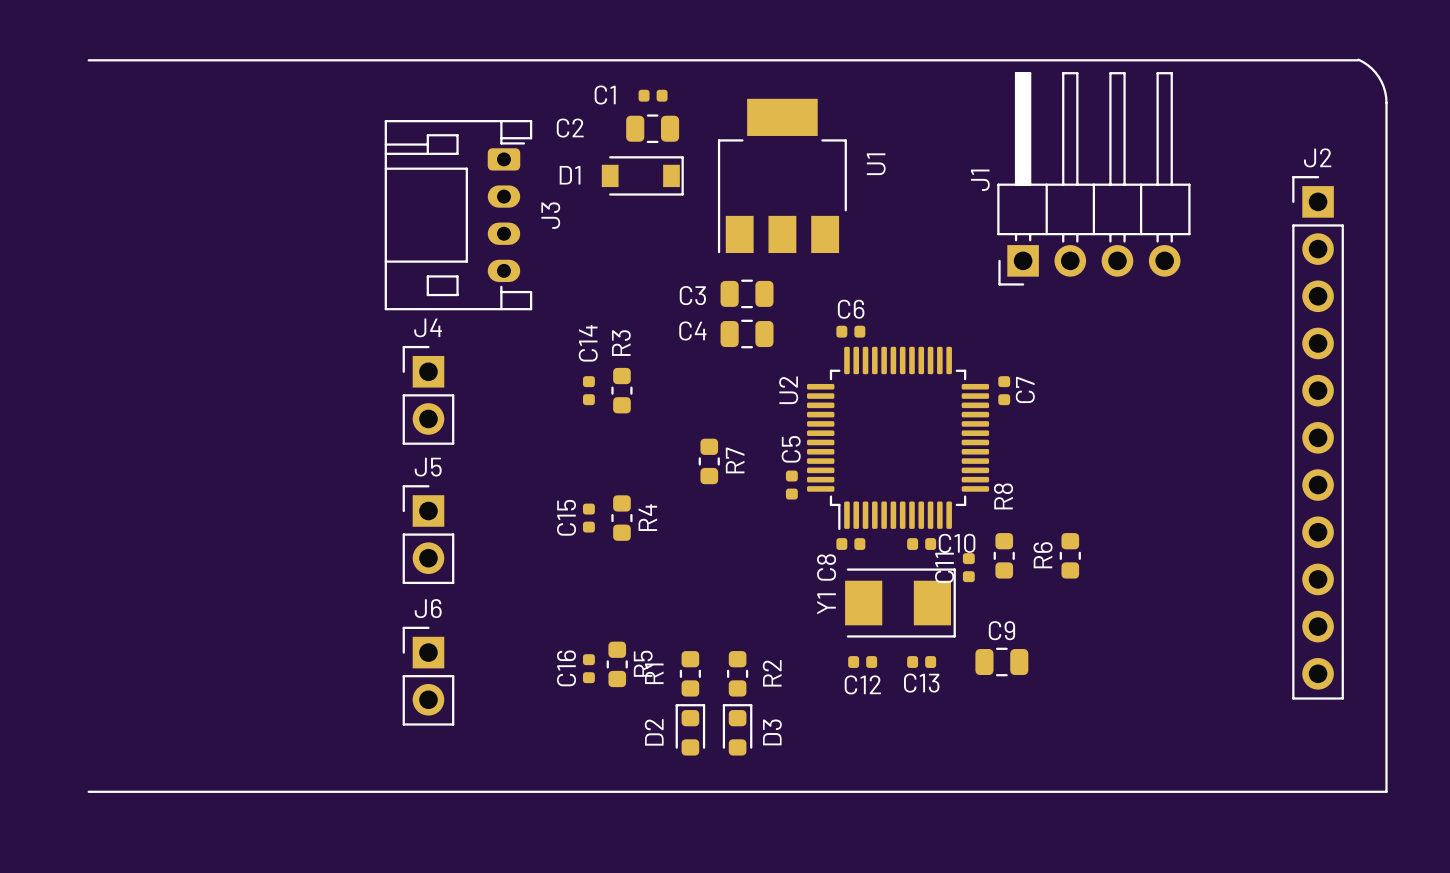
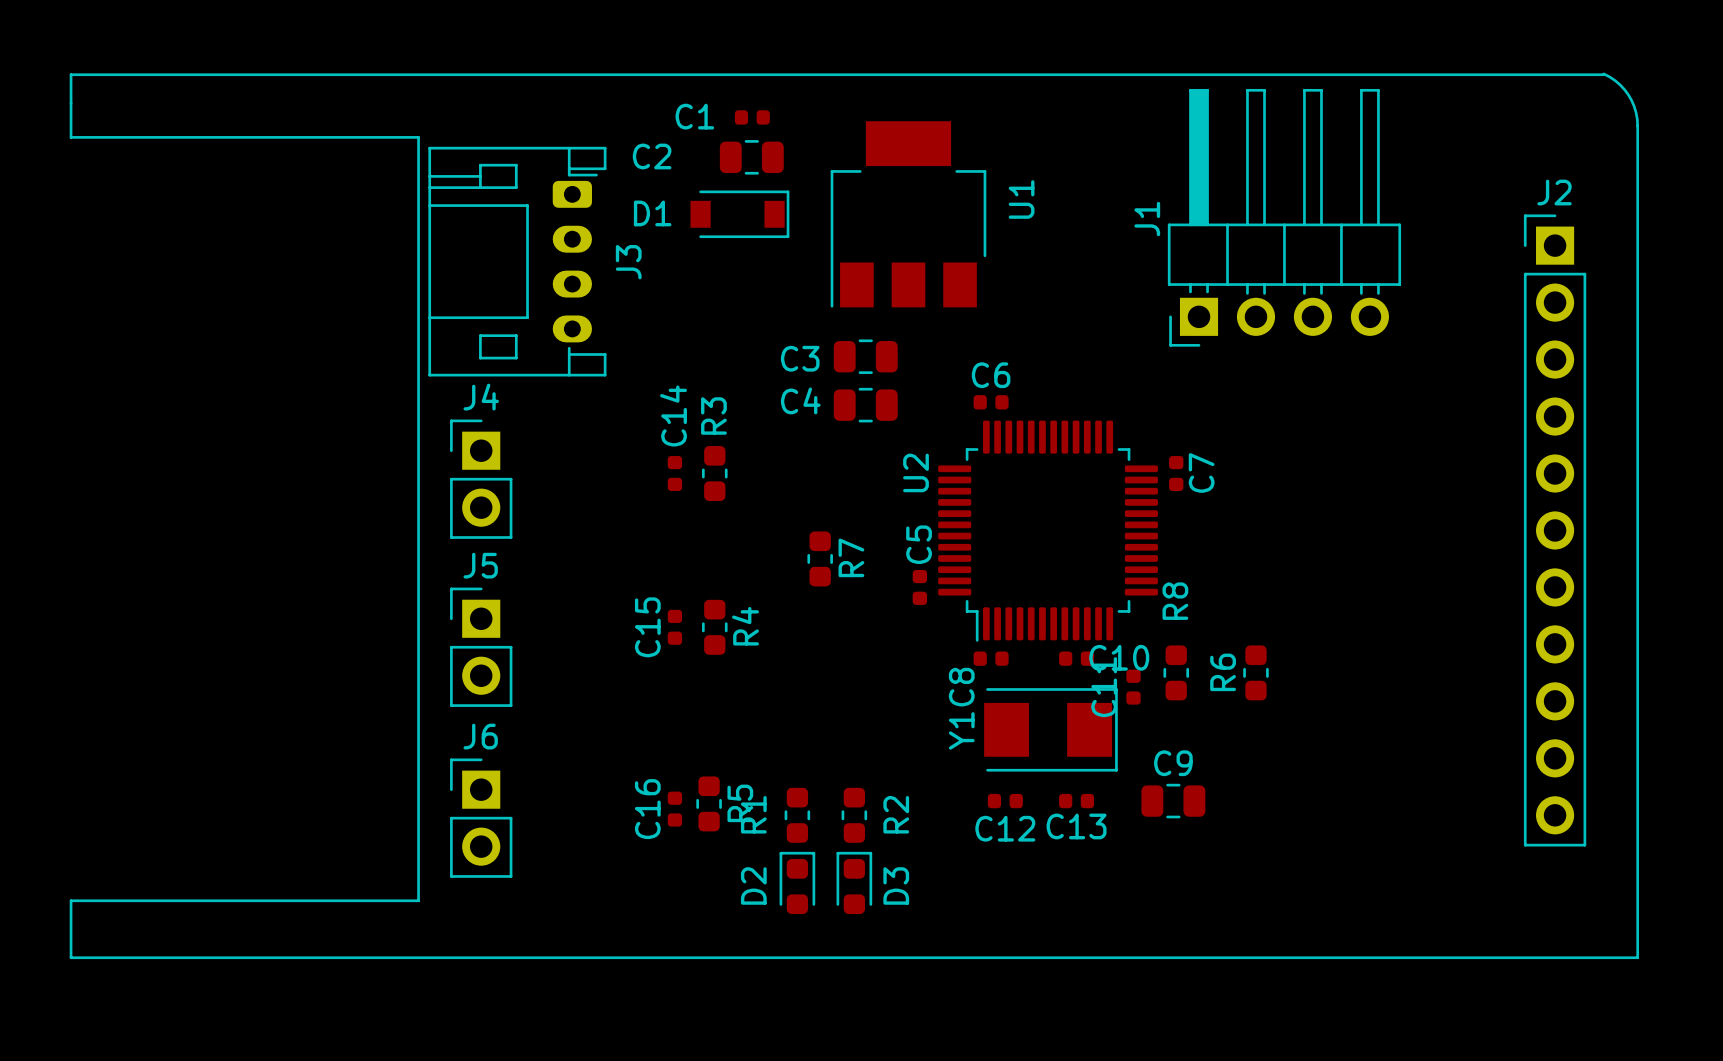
line: none -> (71, 74) (71, 137) (418, 137) (418, 900) (71, 900) (71, 957)

